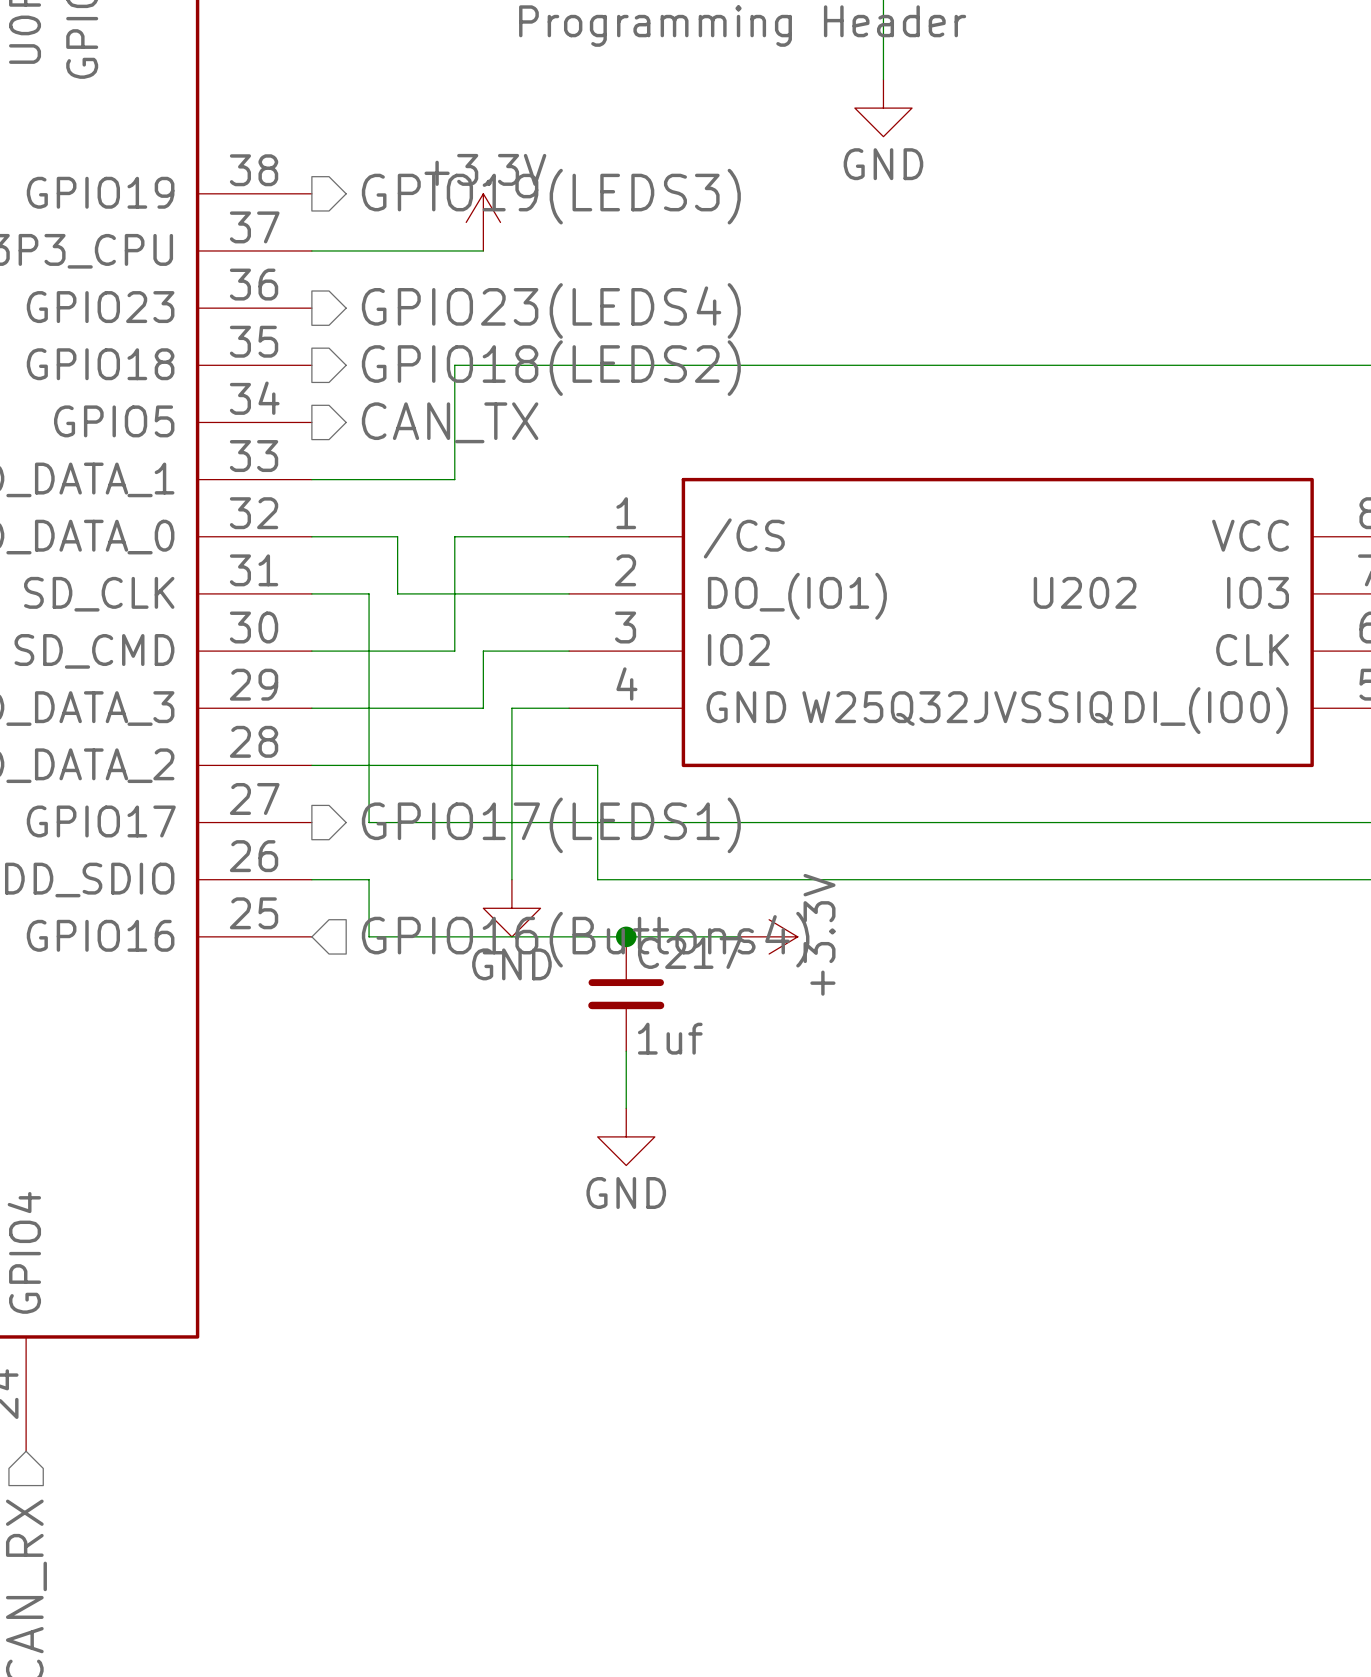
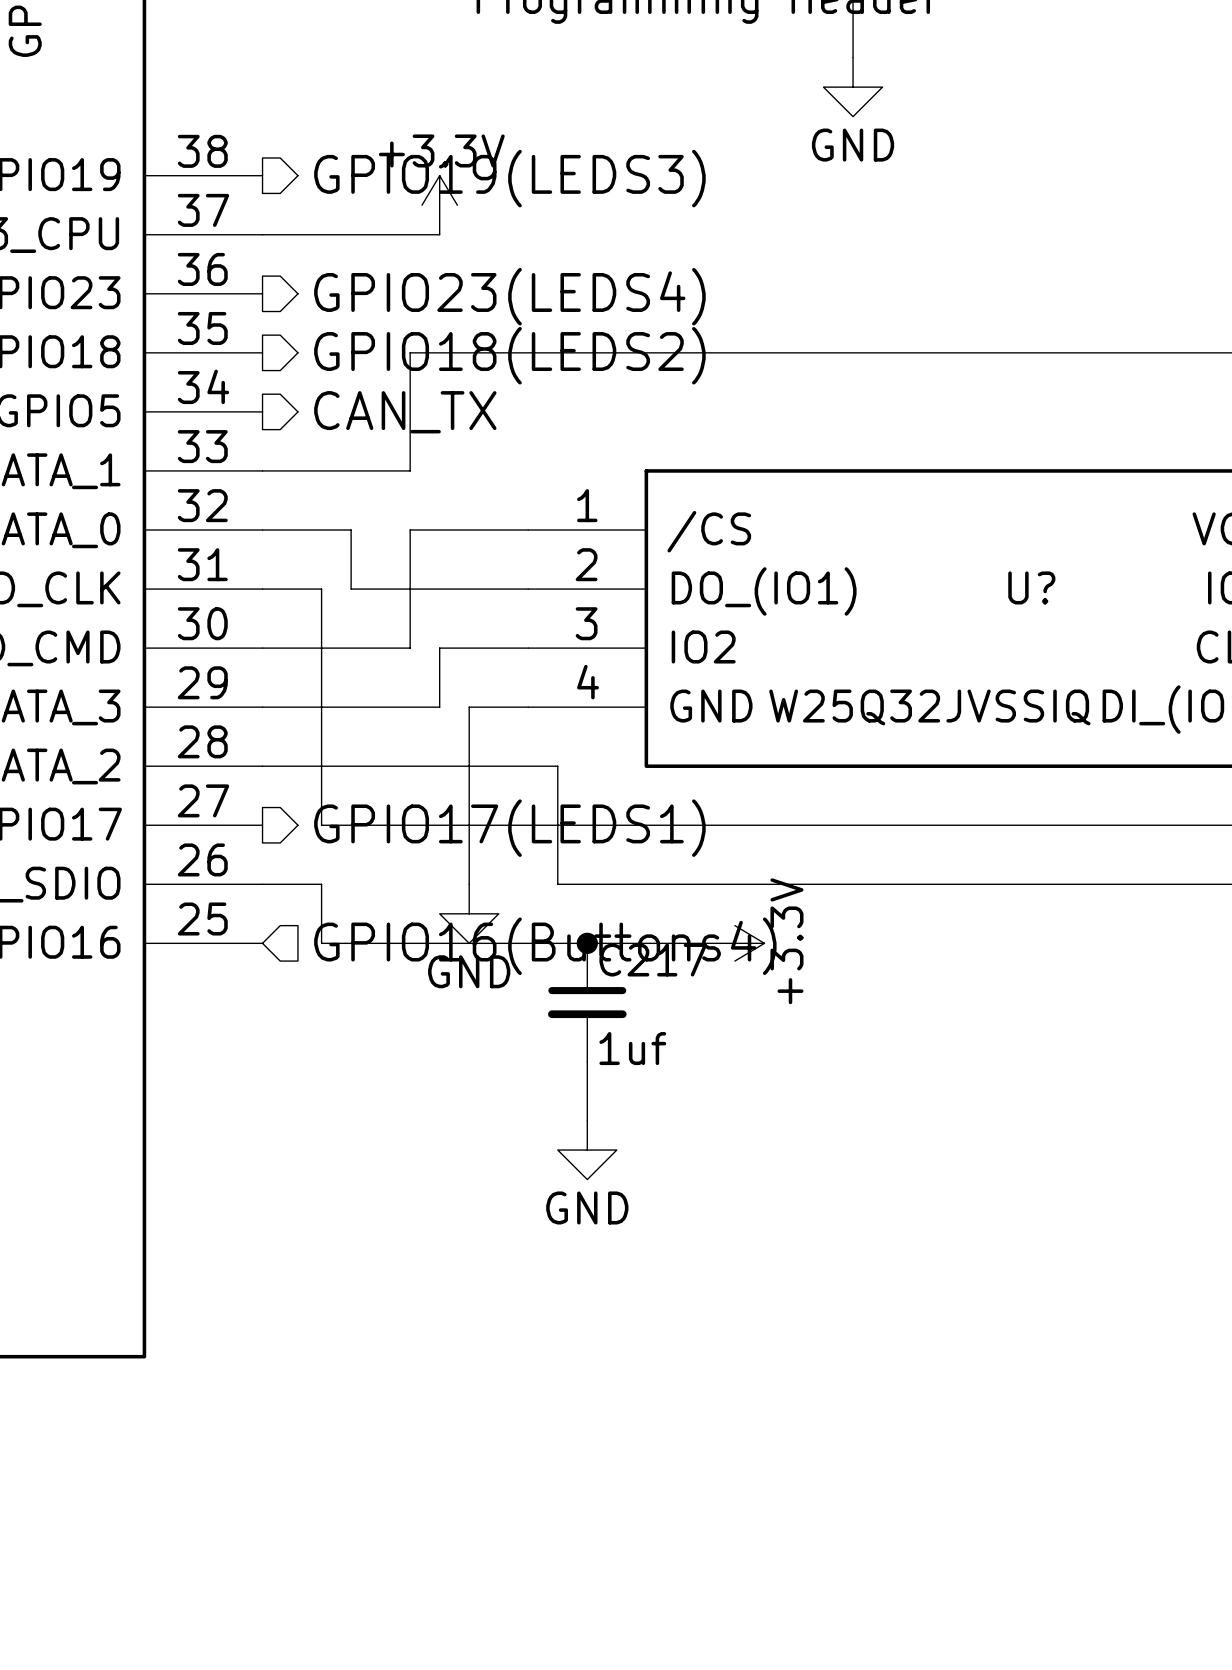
U202 name: U202 (1085, 592) -> U? (1031, 587)

